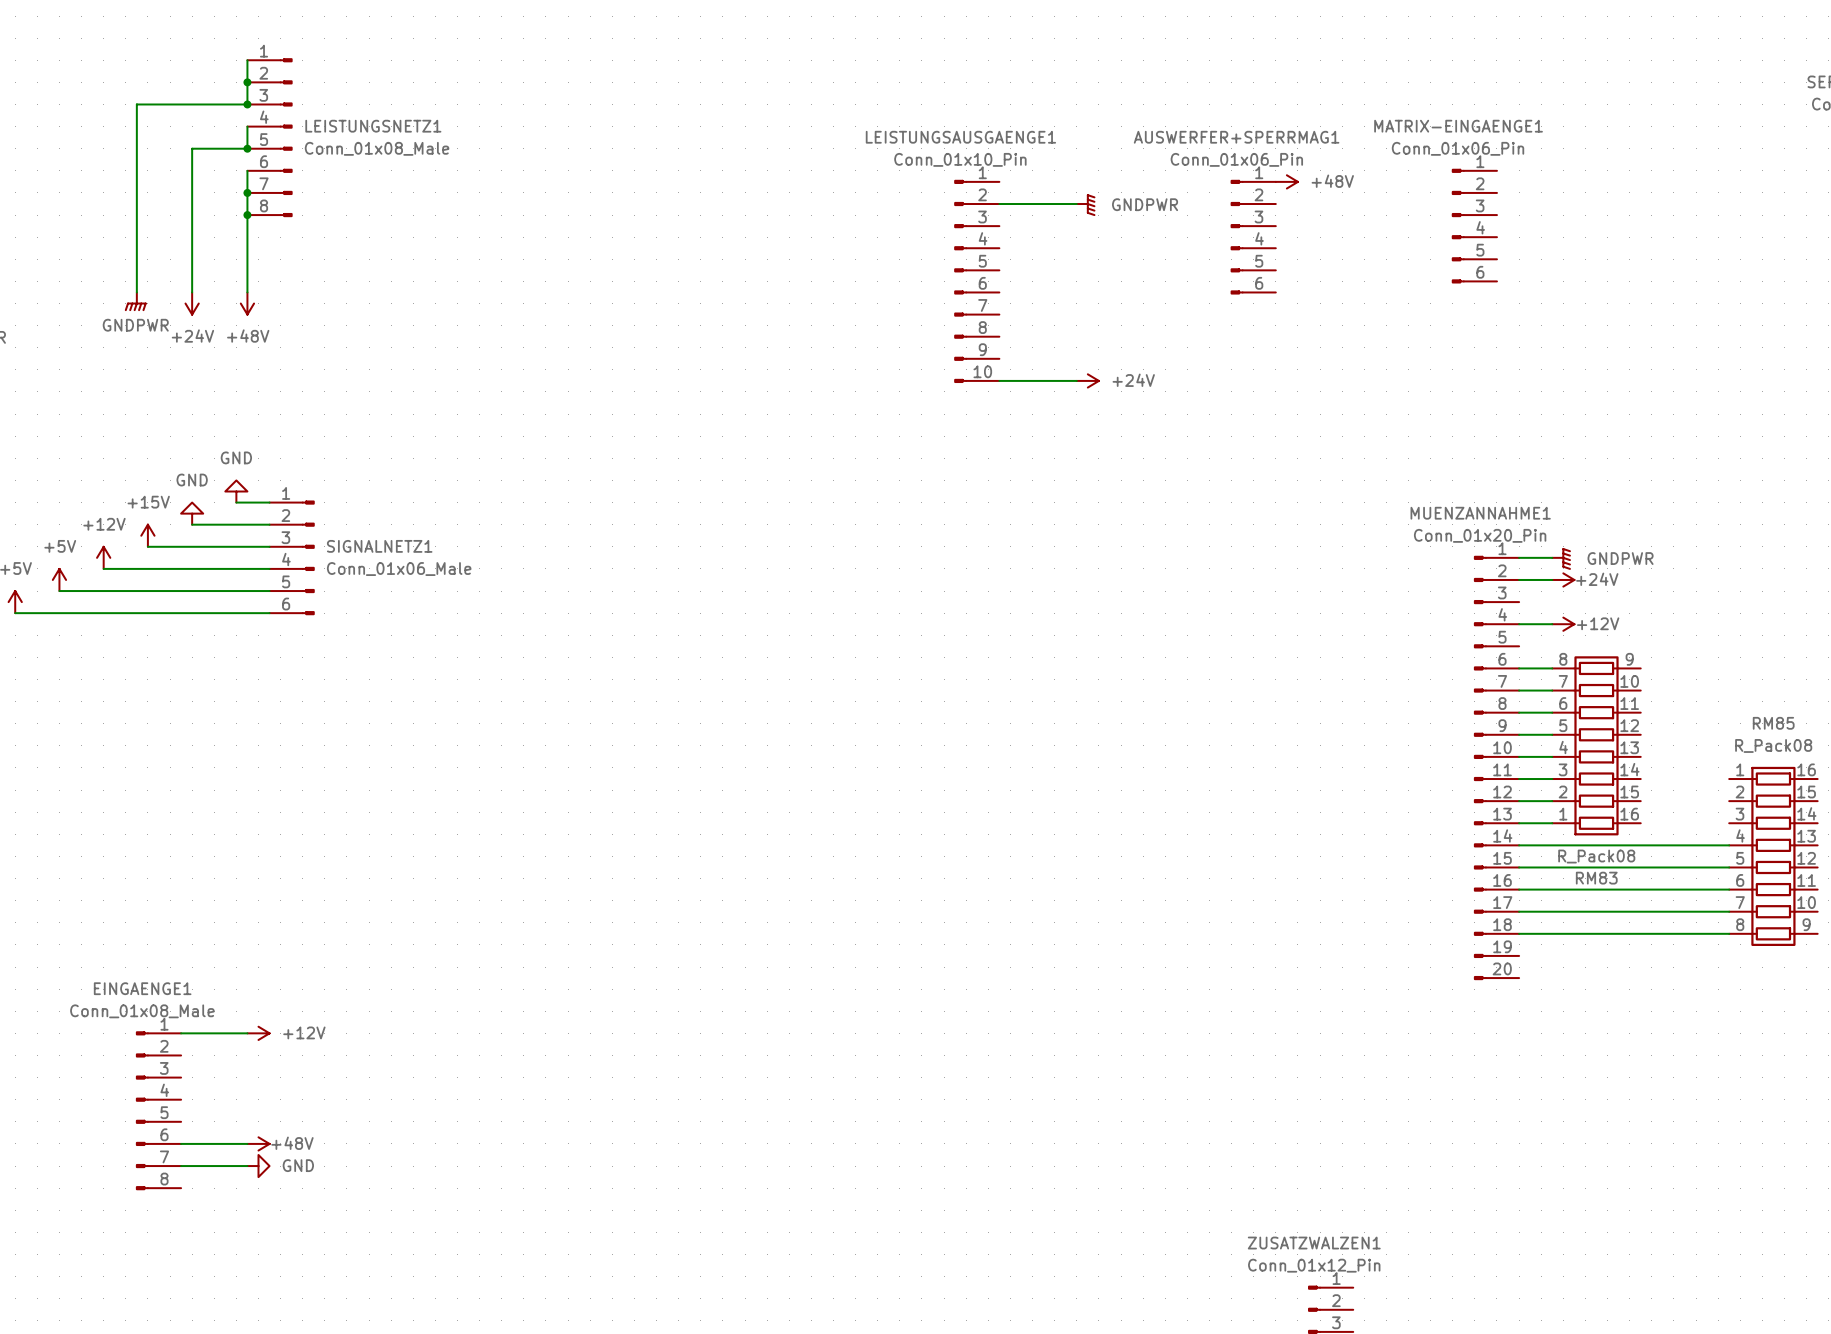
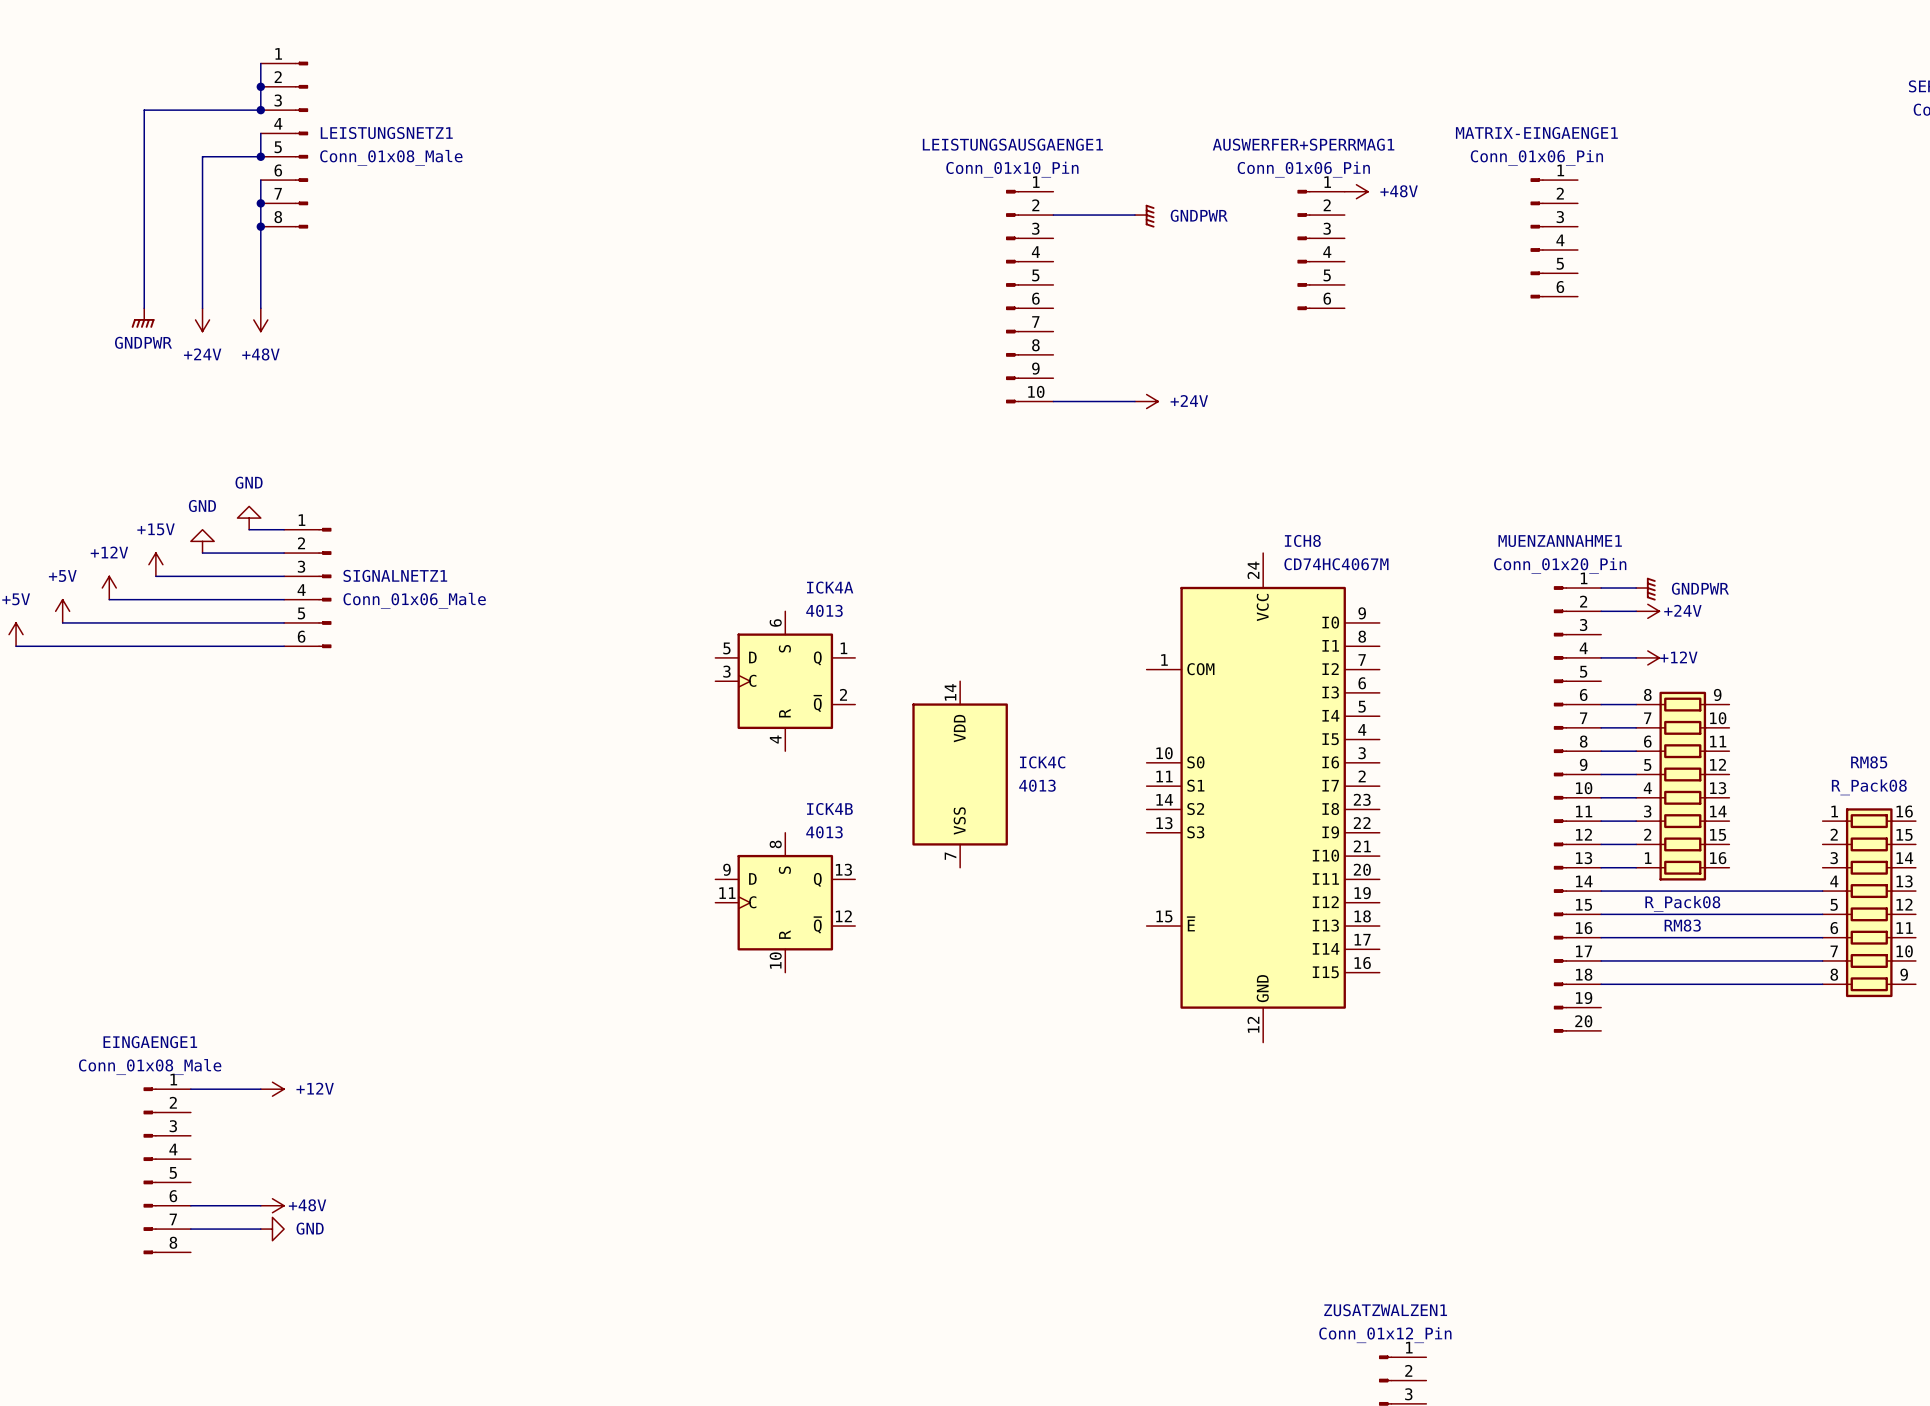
ICK4A: none -> 4013 (785, 681)
ICK4C: none -> 4013 (960, 774)
ICH8: none -> CD74HC4067M (1263, 797)
ICK4B: none -> 4013 (785, 902)

